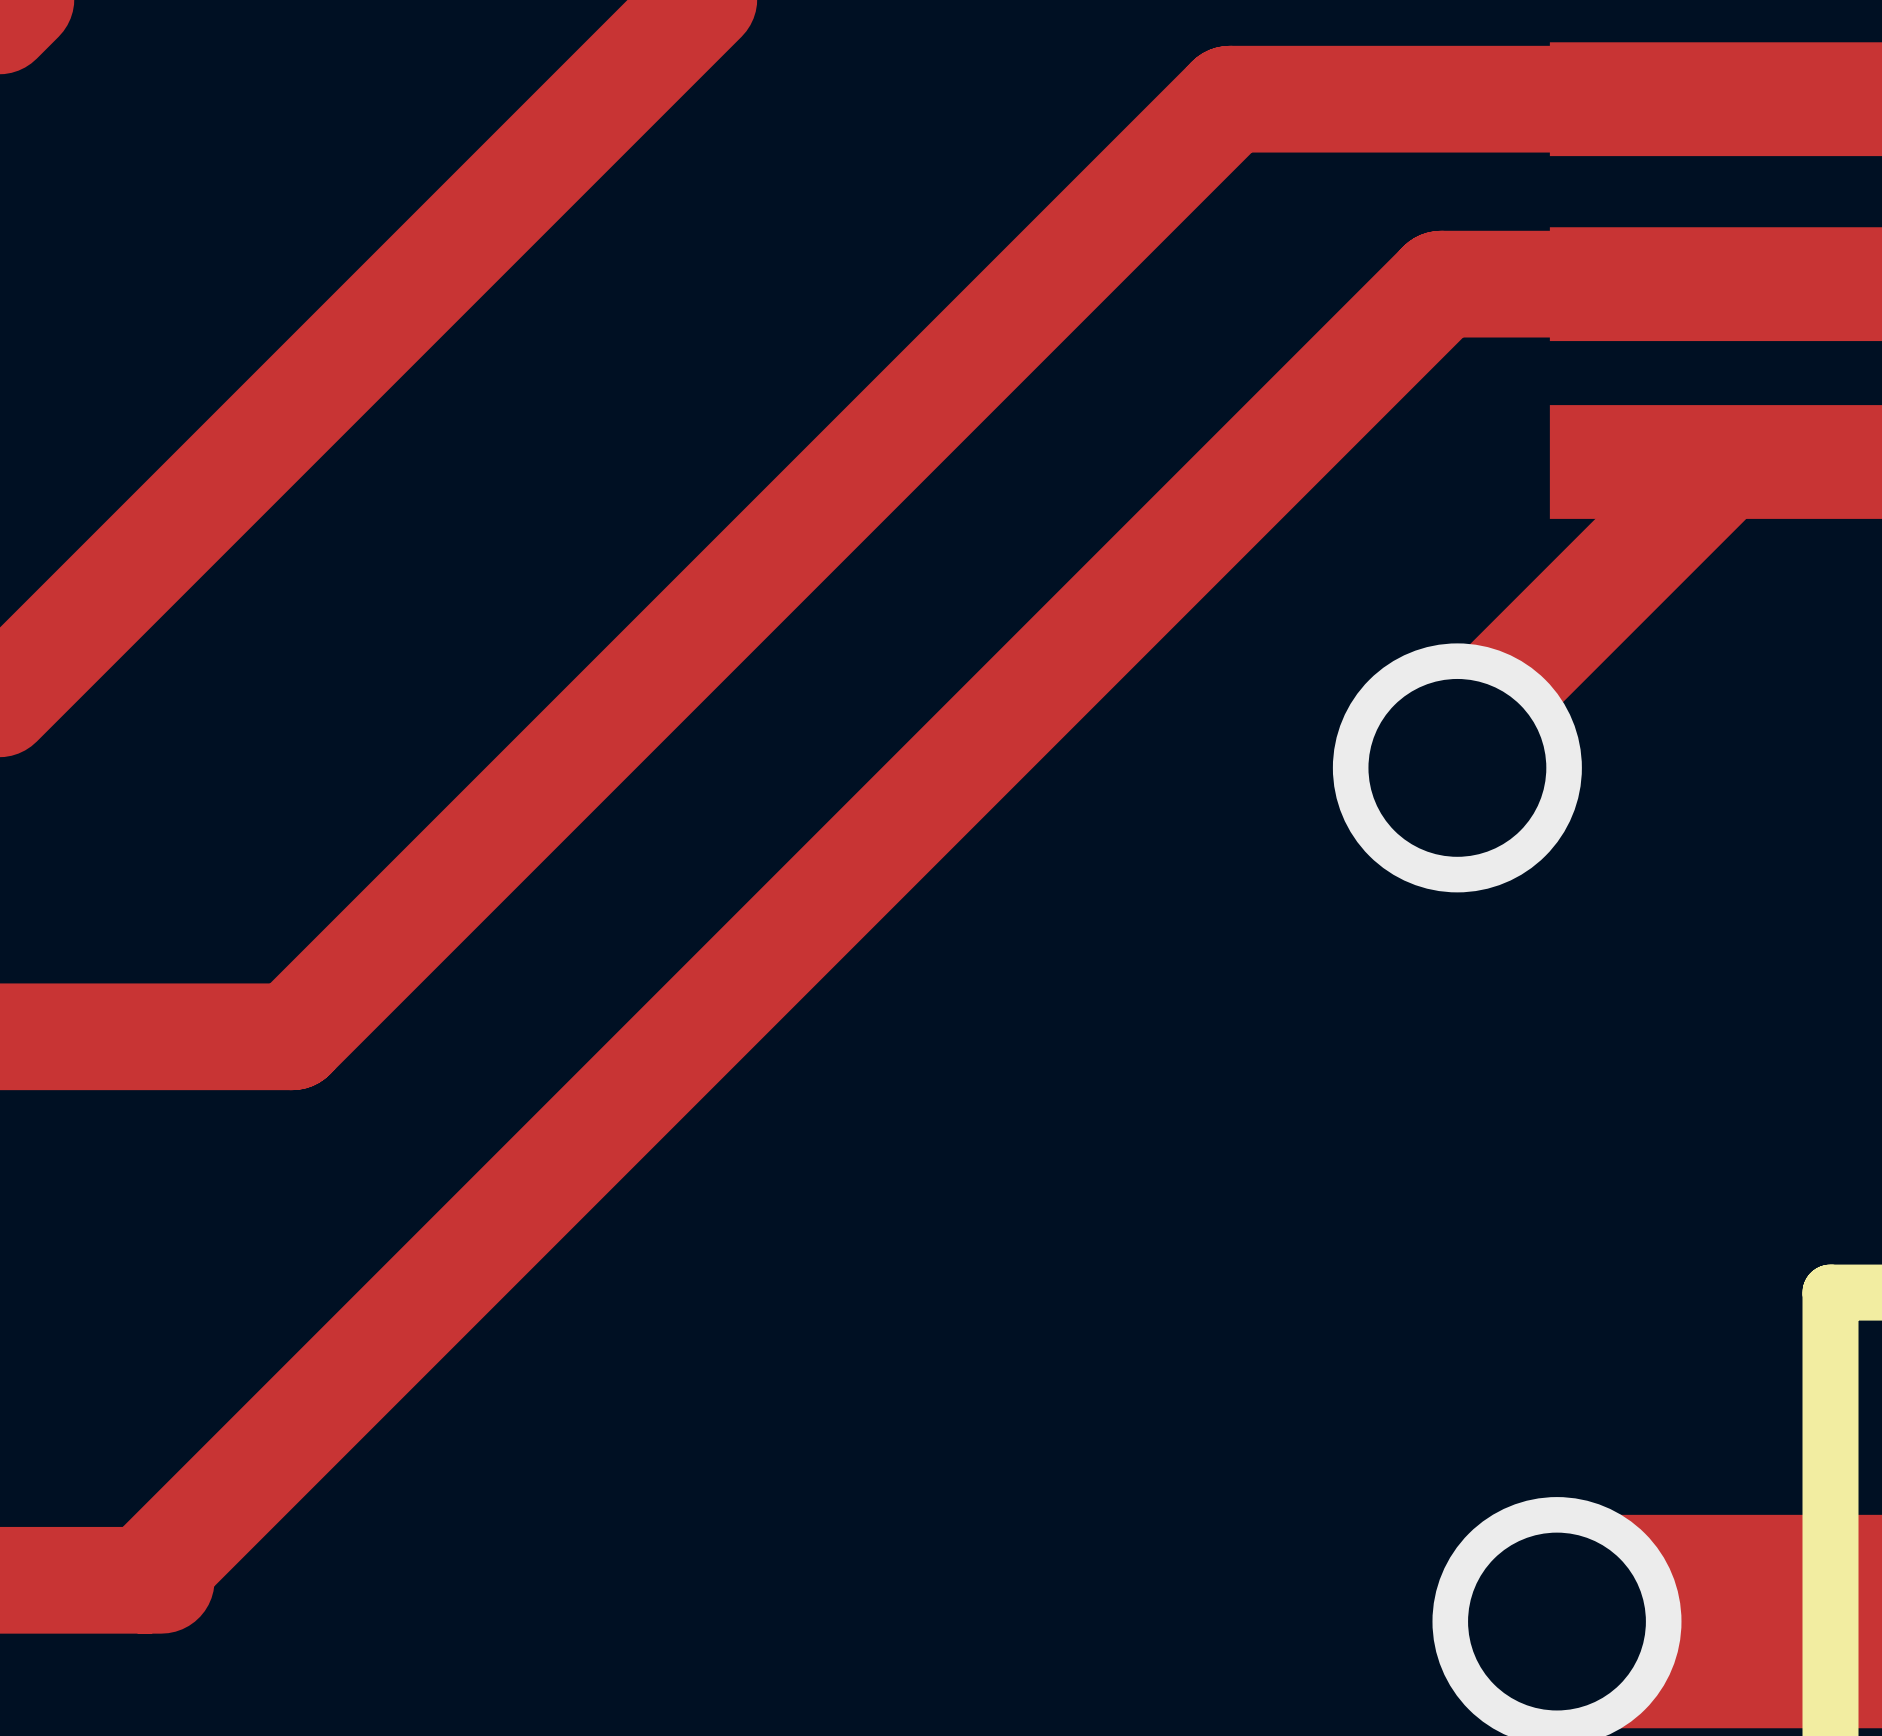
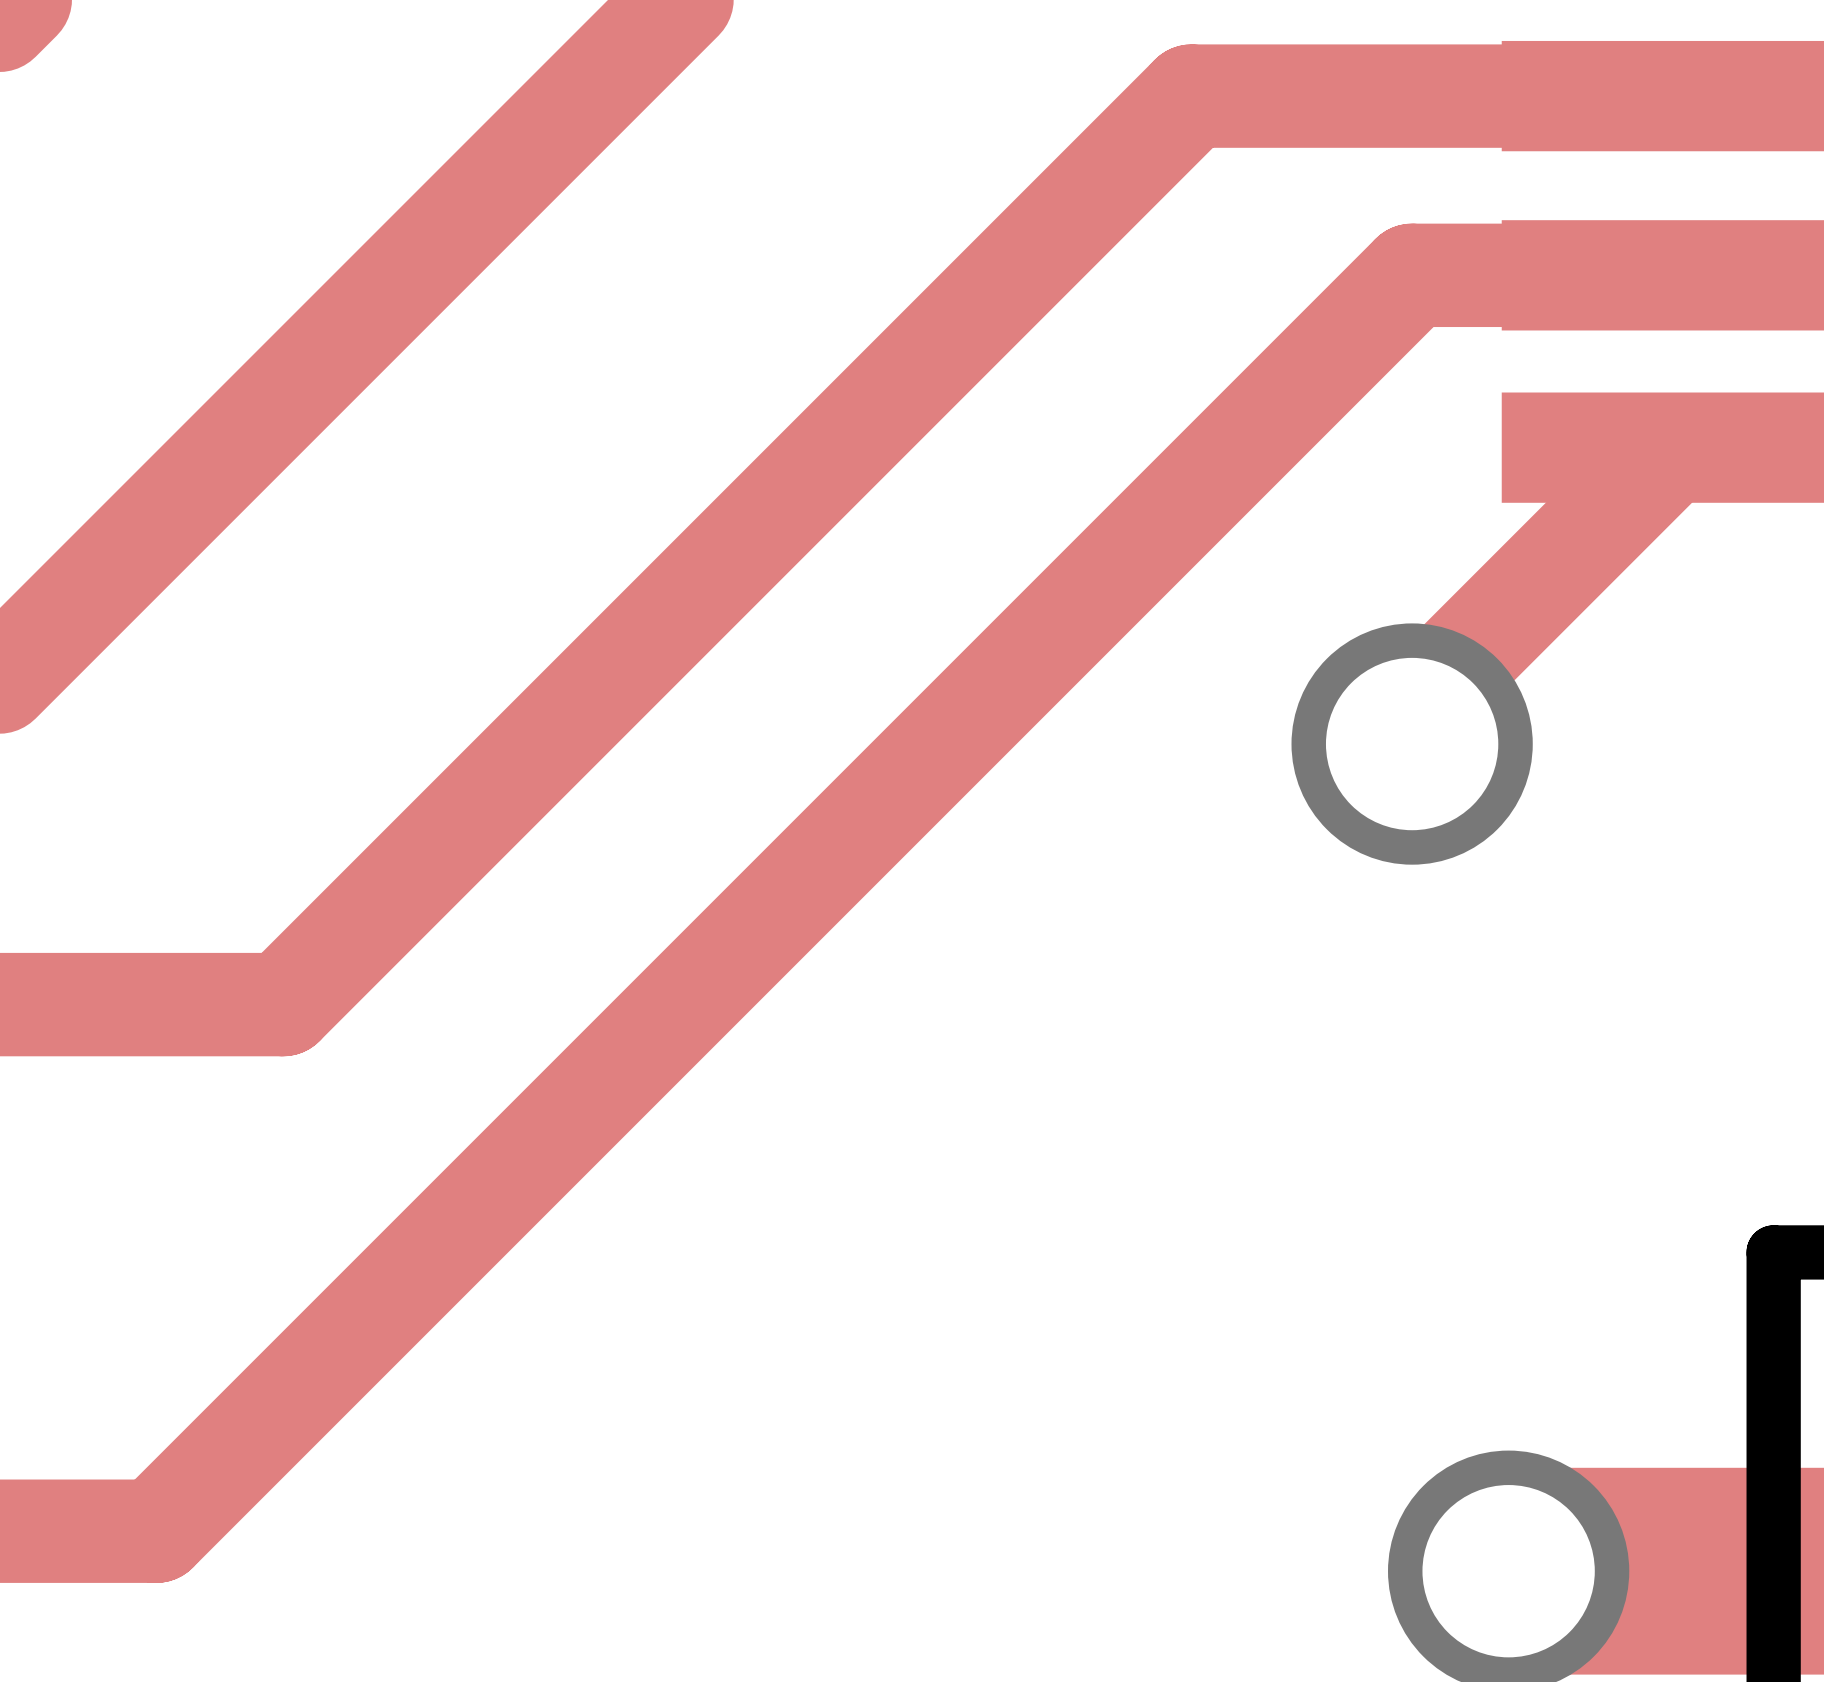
top track: (1457, 284) (1441, 284) (144, 1580) -> (1412, 275) (156, 1531)

